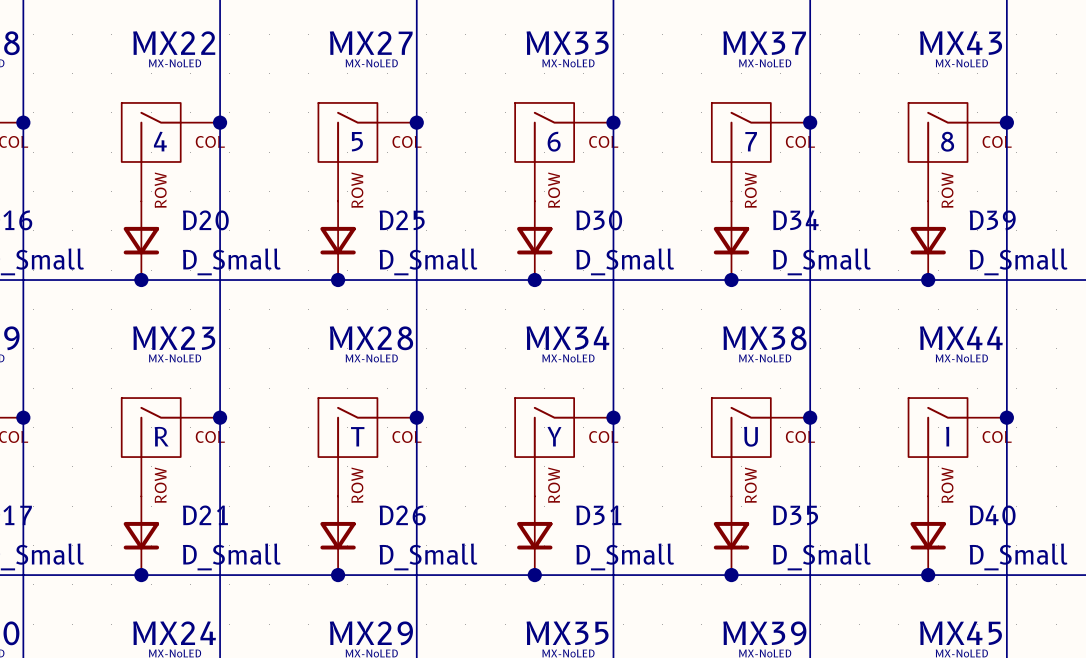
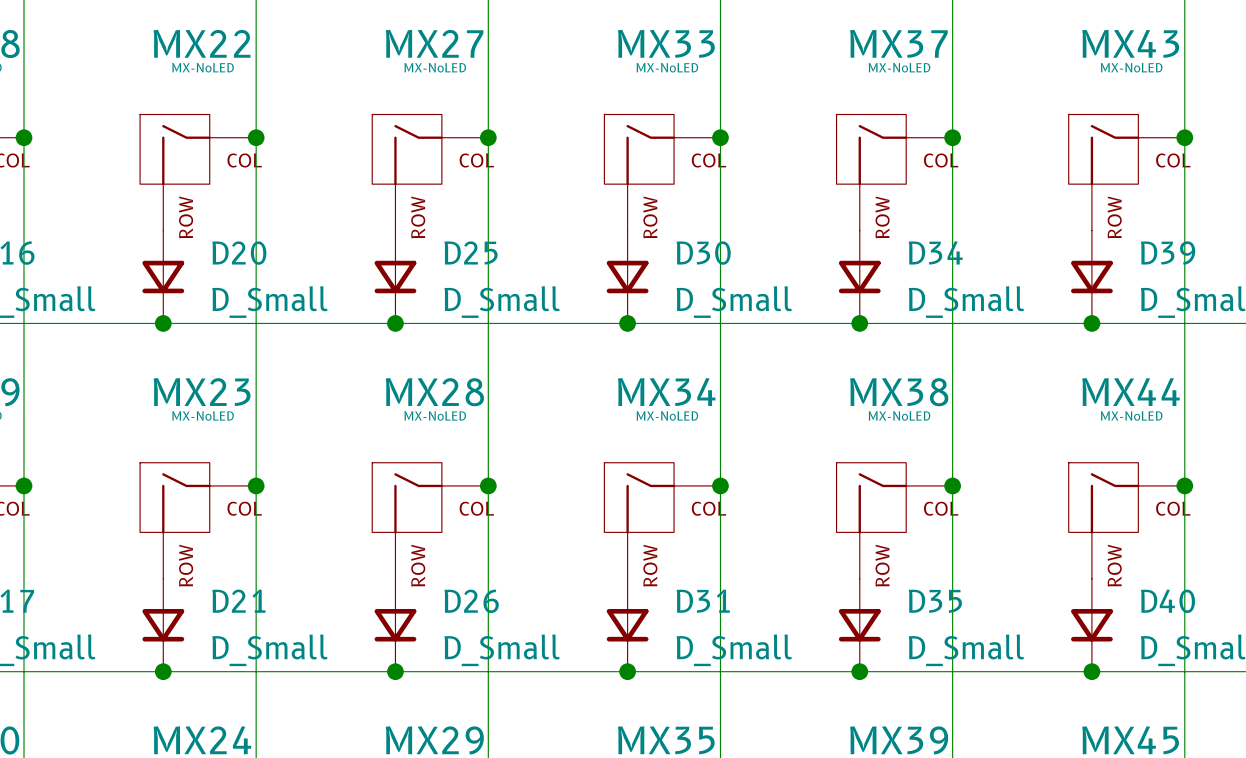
MX22 text: 4 (160, 141) -> none
MX27 text: 5 (357, 141) -> none
MX33 text: 6 (554, 141) -> none
MX37 text: 7 (751, 141) -> none
MX43 text: 8 (947, 141) -> none
MX23 text: R (161, 436) -> none
MX28 text: T (357, 436) -> none
MX34 text: Y (554, 436) -> none
MX38 text: U (750, 436) -> none
MX44 text: I (947, 436) -> none

